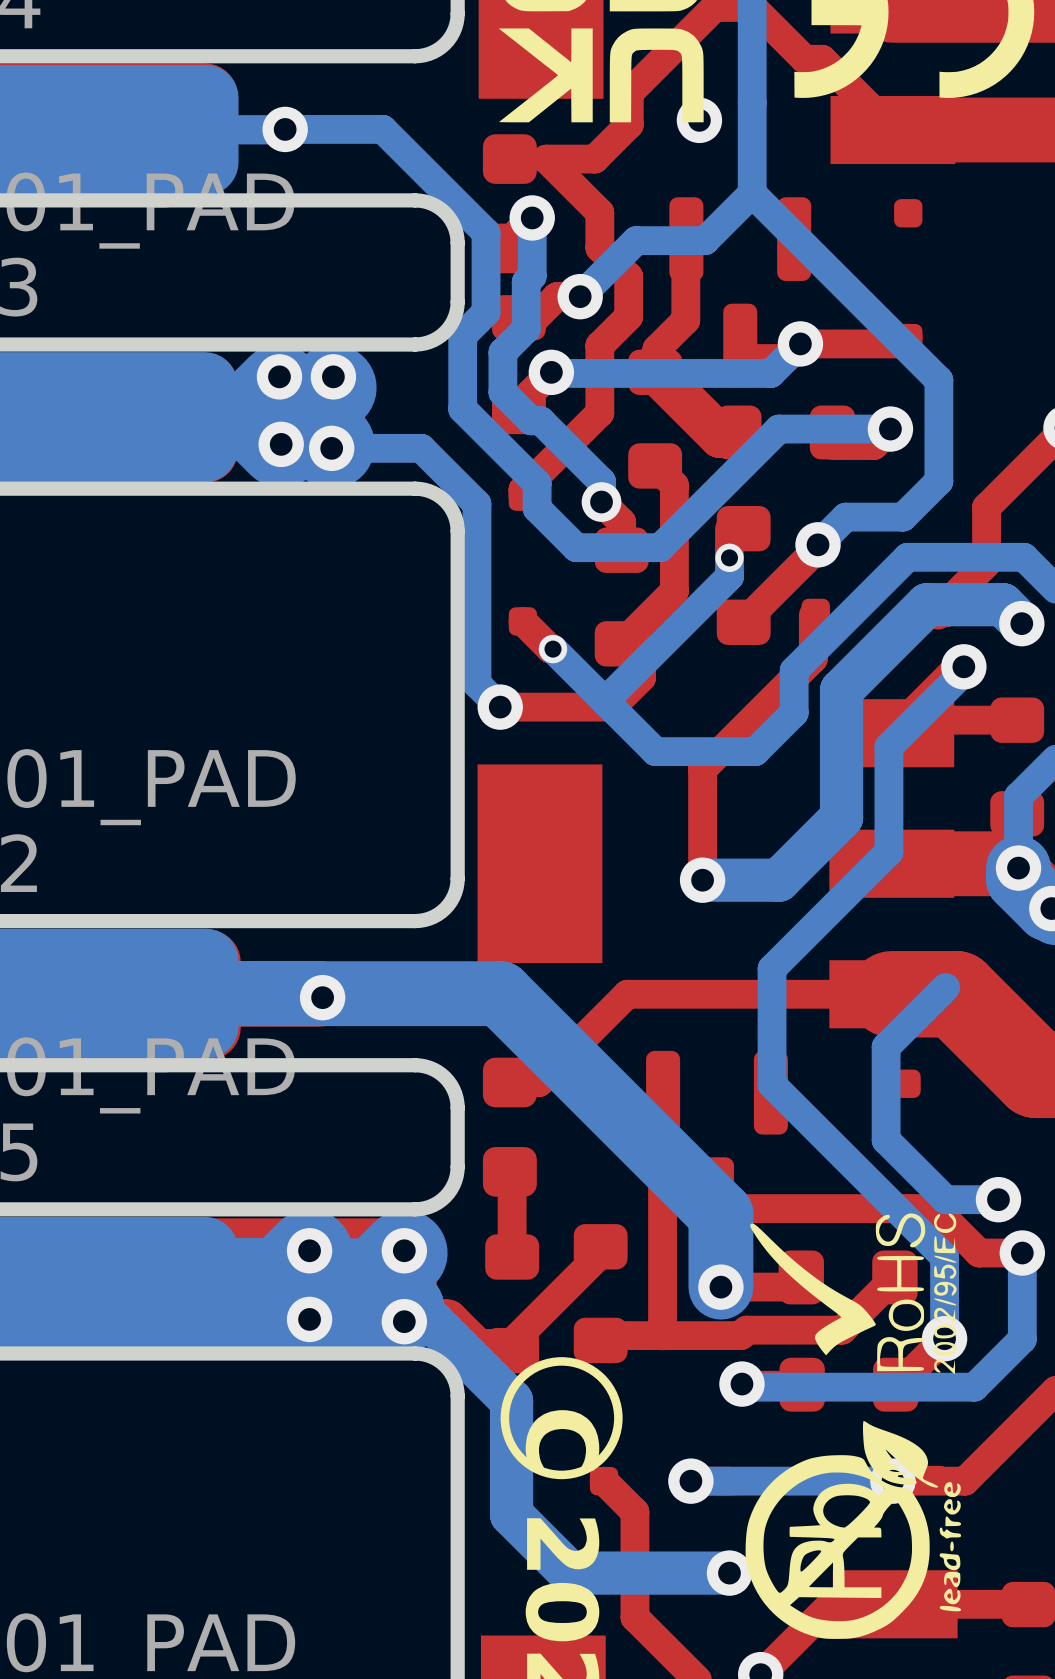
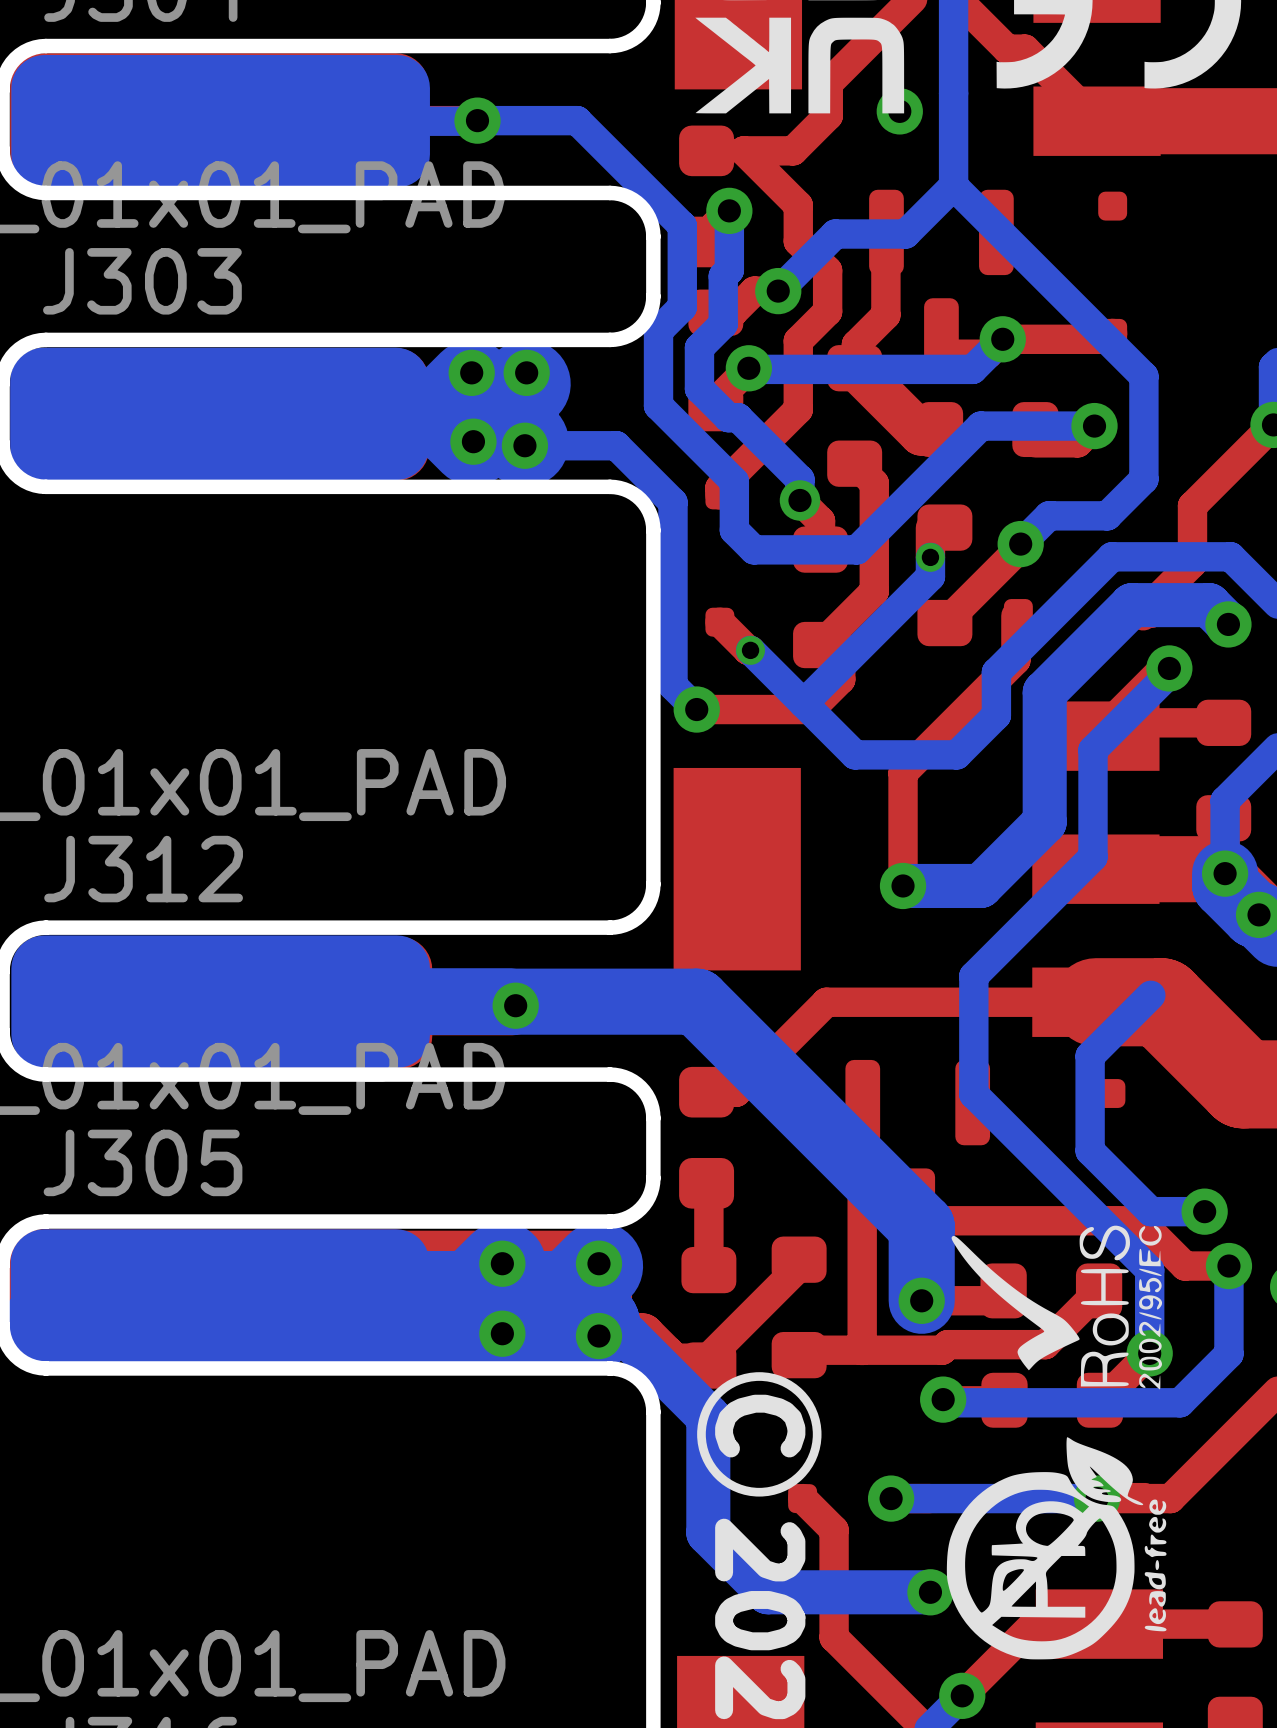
bottom track: (537, 508) (576, 547) (660, 547) -> (734, 507) (734, 530) (754, 549) (856, 549) (859, 546)

